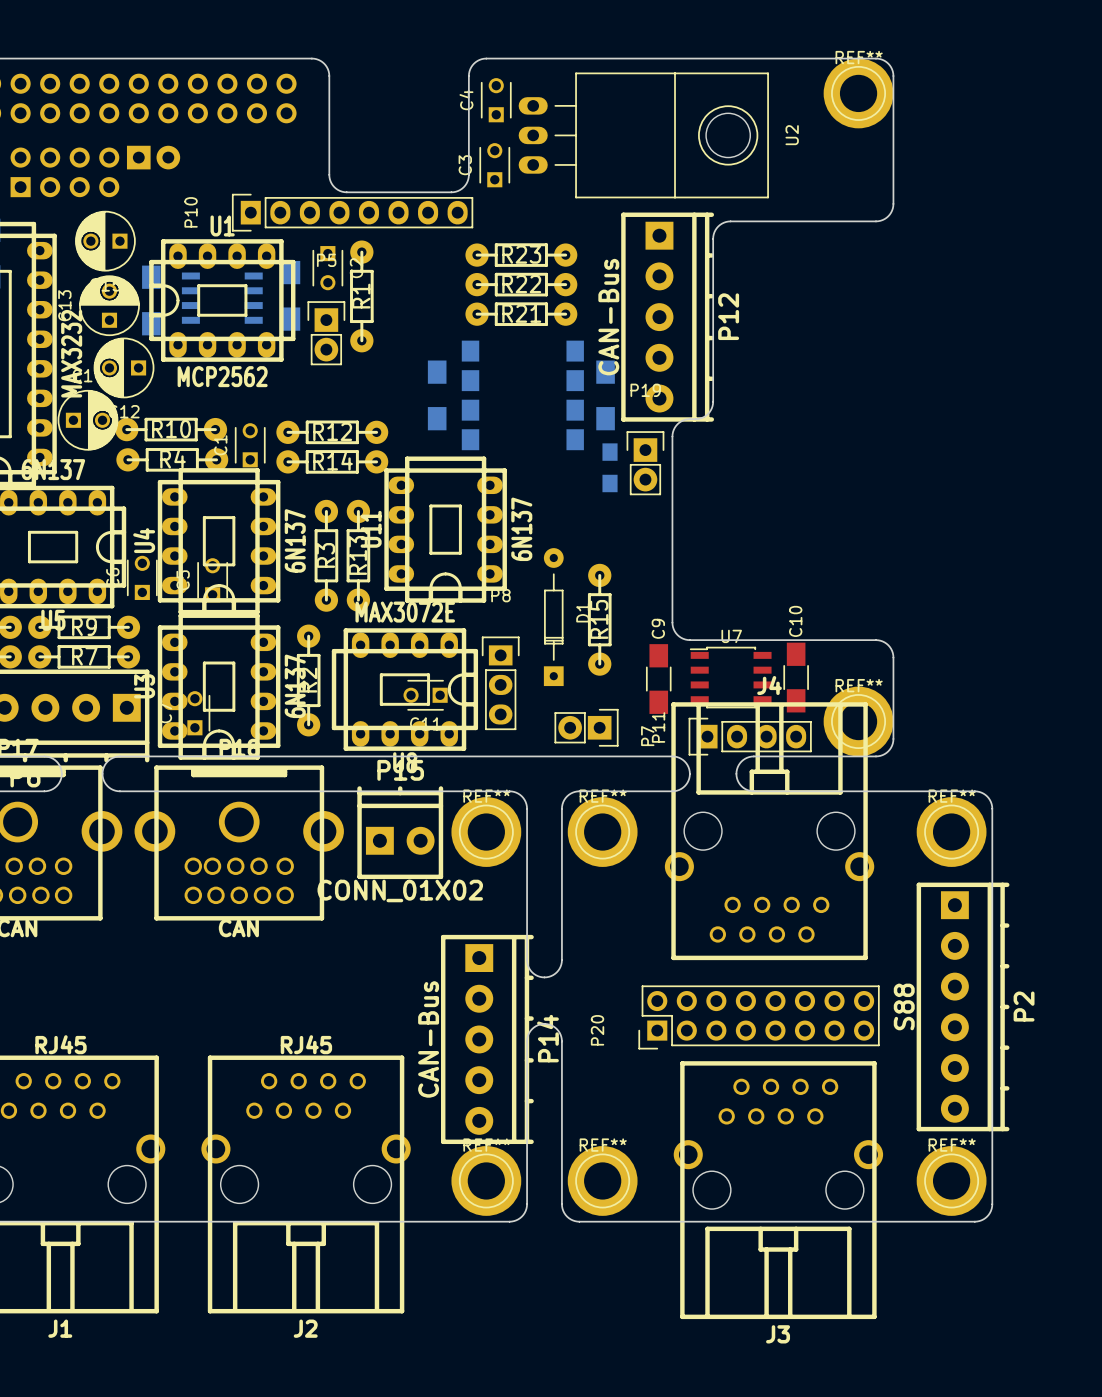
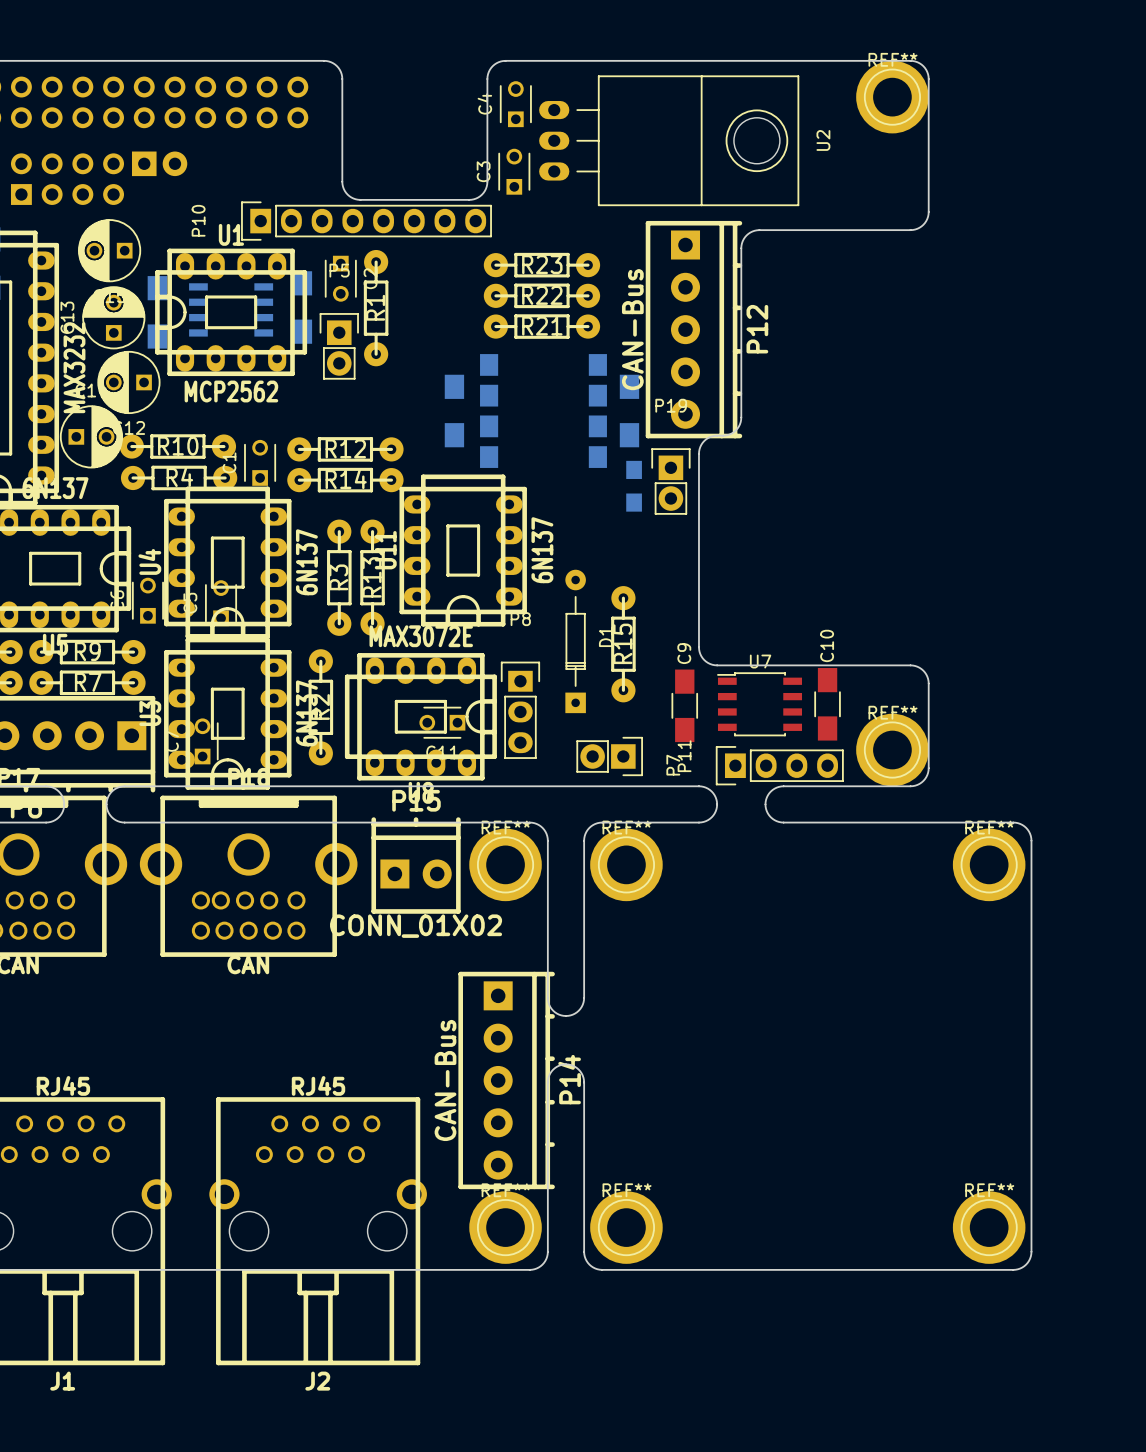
J4: (769, 831) -> none
P2: S88 (963, 1006) -> none
P20: (759, 1017) -> none
J3: (778, 1190) -> none

